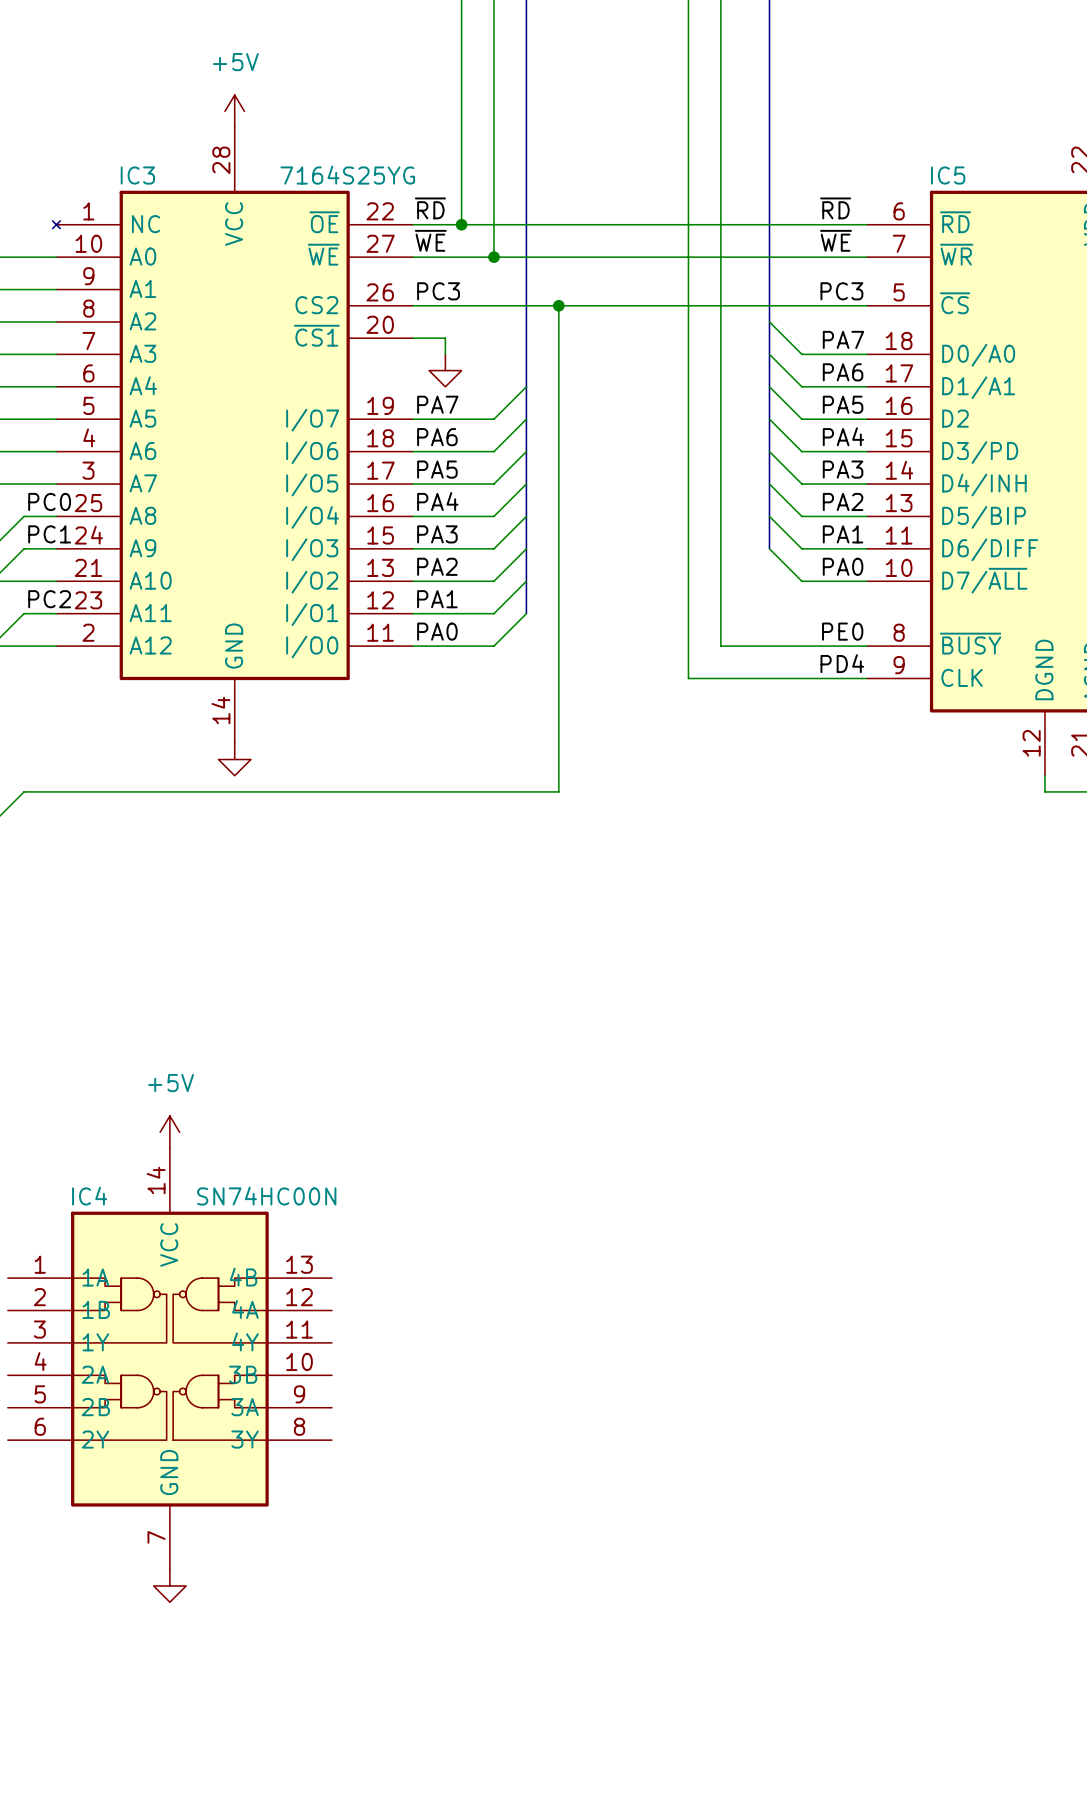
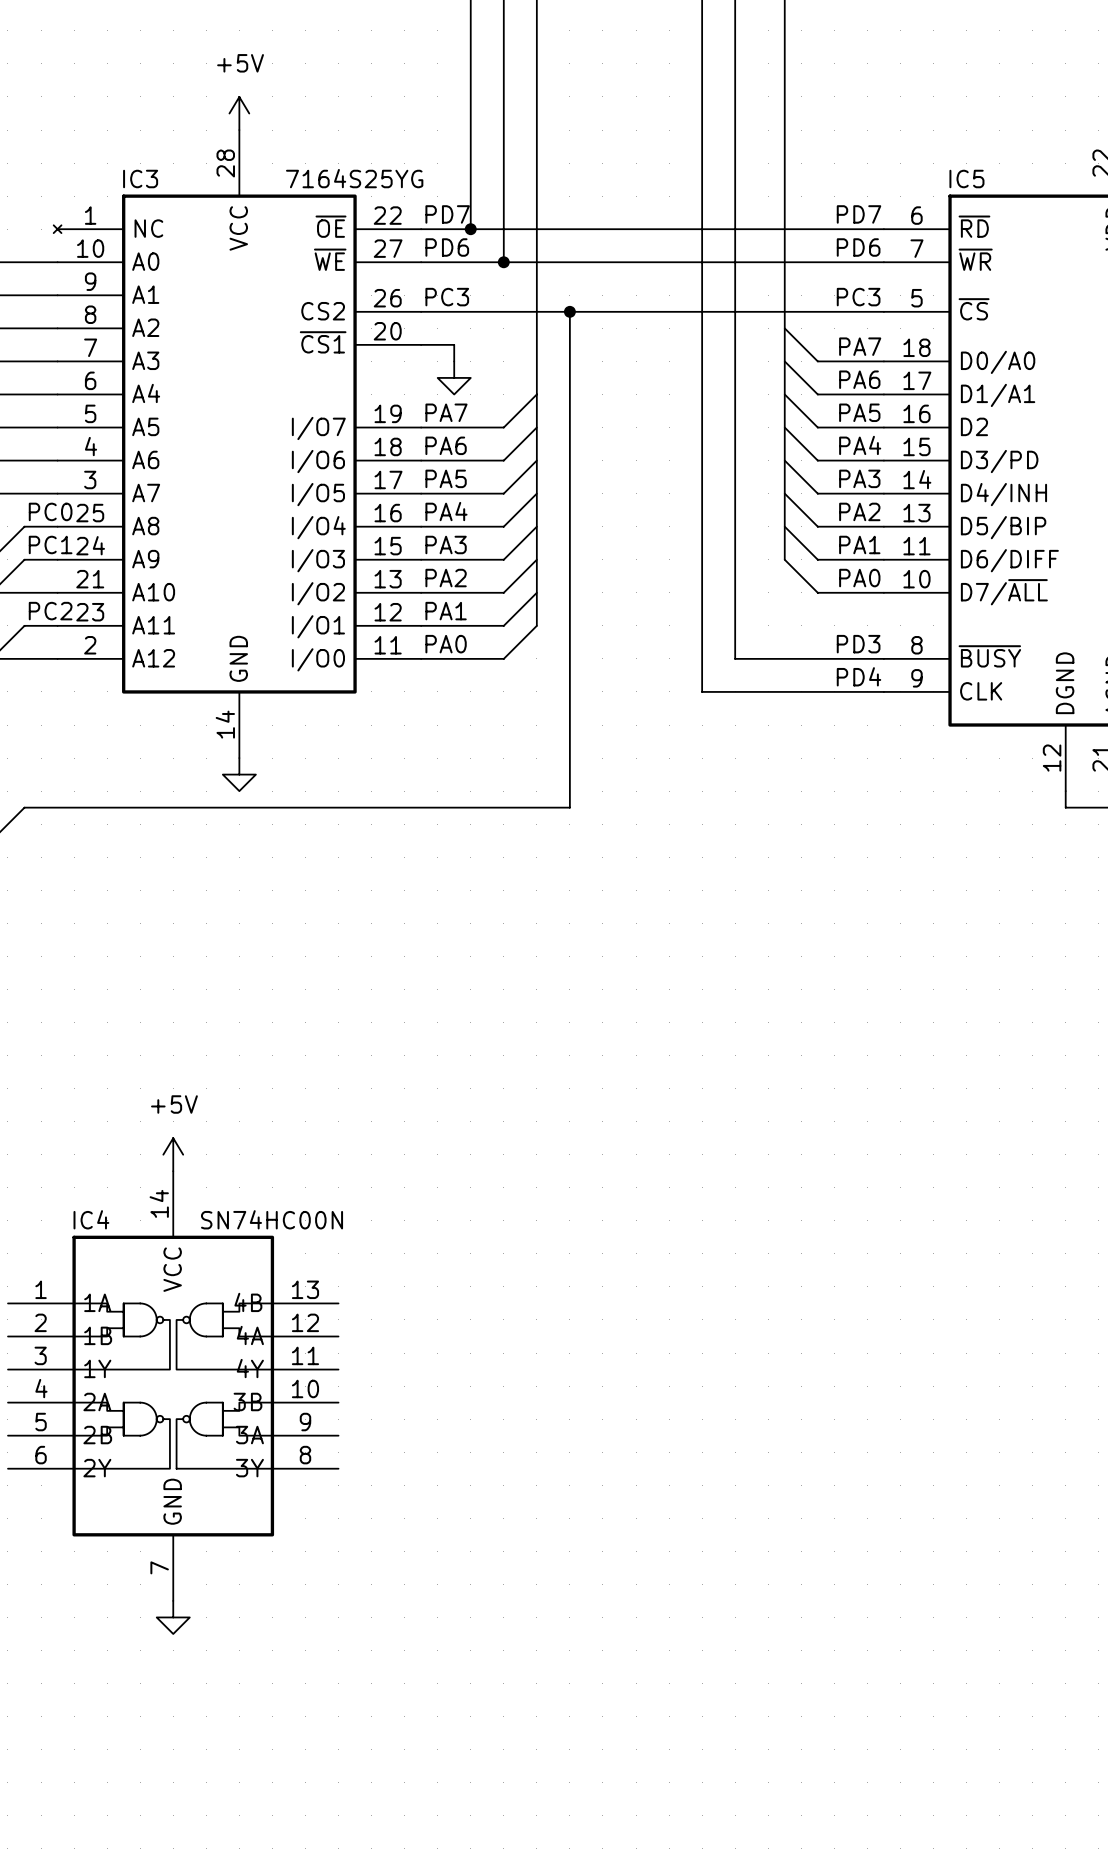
label: ~{RD} (430, 208) -> PD7 (447, 214)
label: ~{RD} (835, 208) -> none
label: none -> PD7 (859, 214)
label: ~{WE} (430, 240) -> PD6 (447, 247)
label: ~{WE} (835, 240) -> none
label: none -> PD6 (858, 247)
label: PE0 (842, 631) -> PD3 (858, 644)

